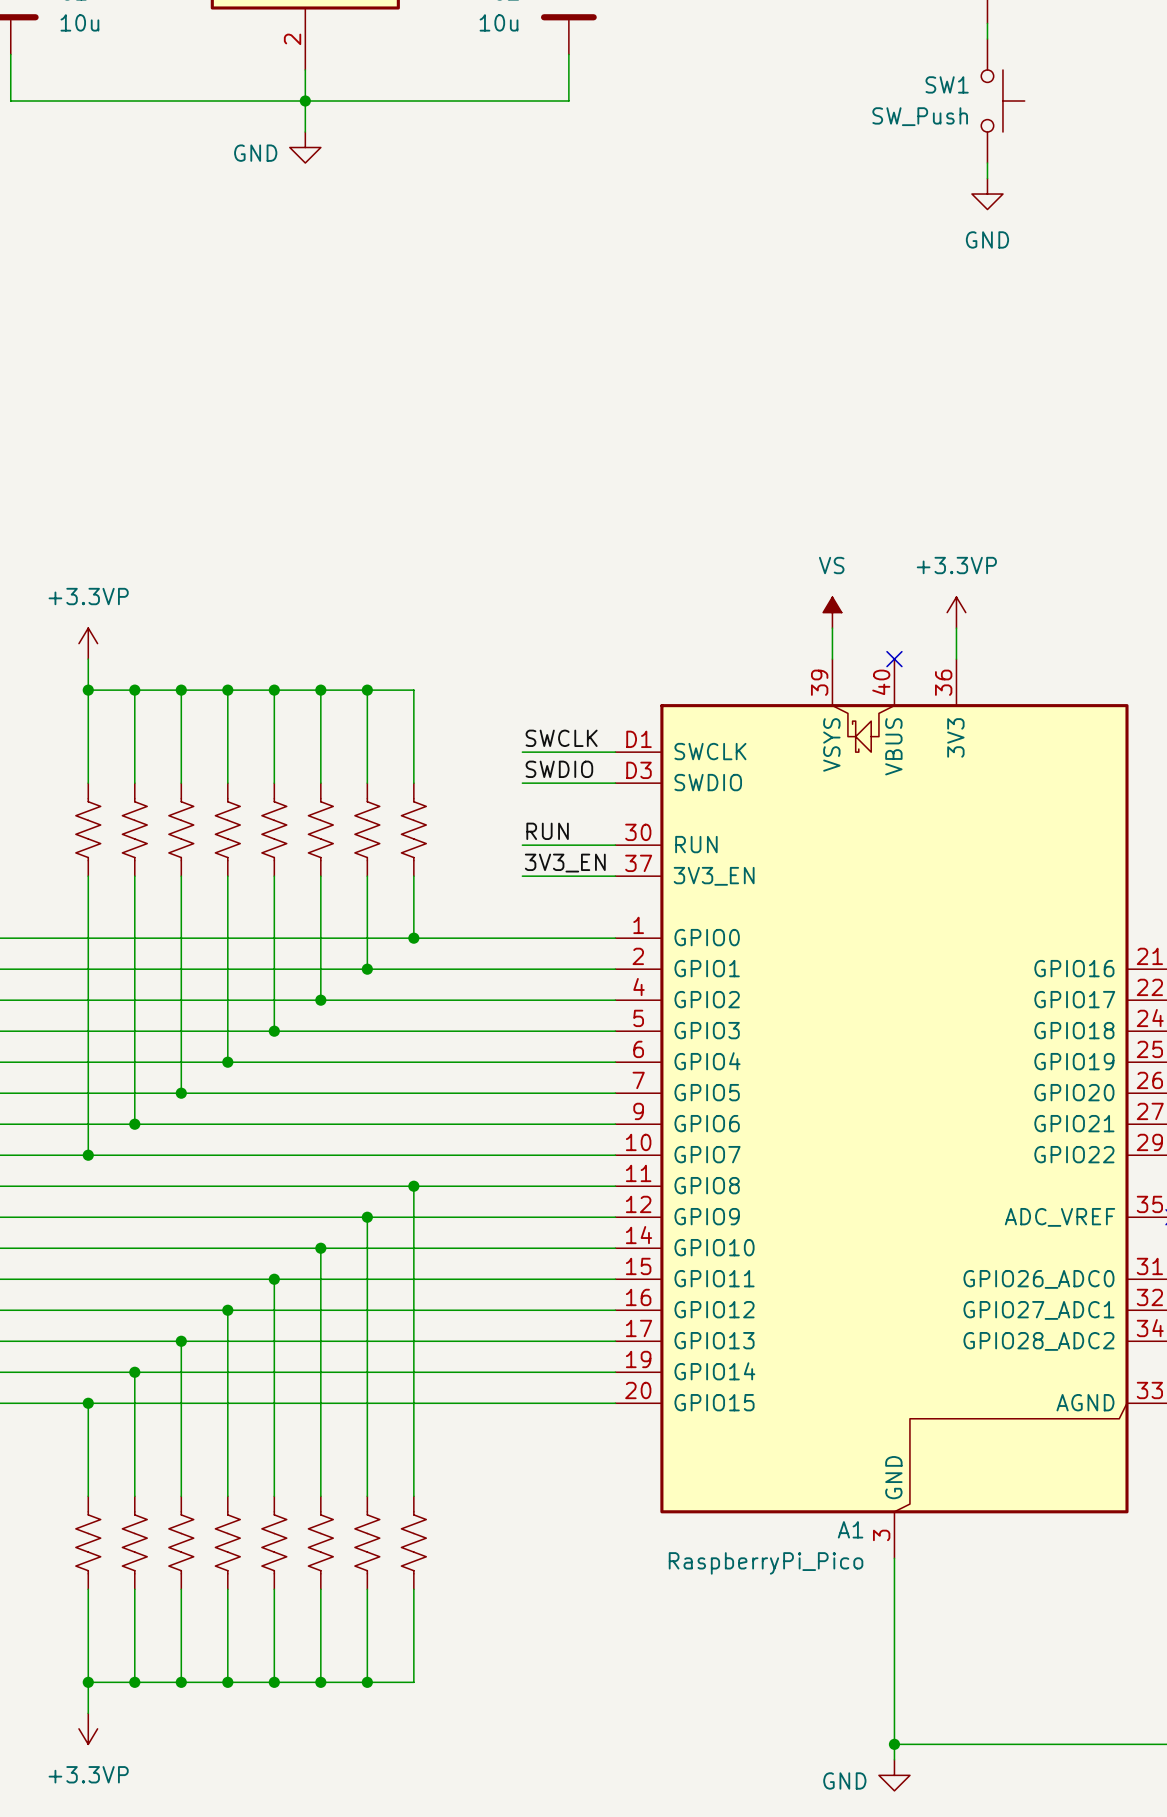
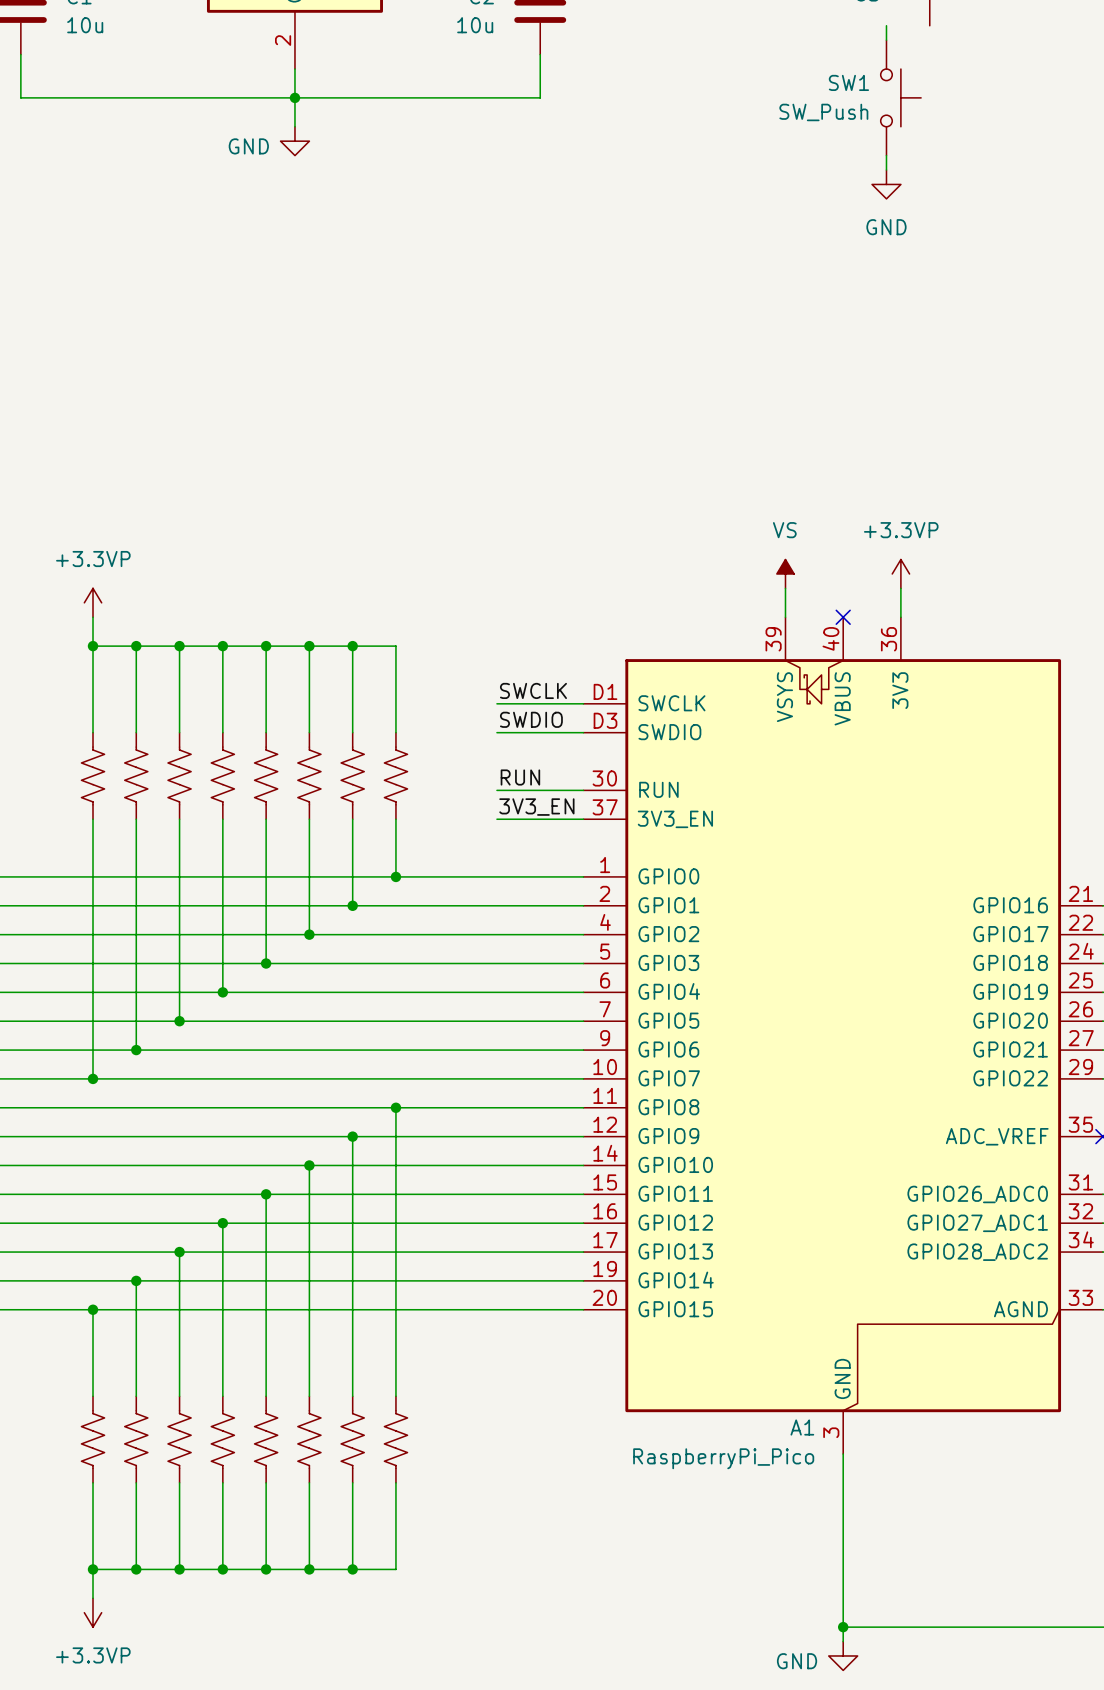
wire: (987, 23) (987, 38) -> (886, 25) (886, 40)
SW1 position: (1002, 101) -> (900, 97)
wire: (987, 163) (987, 178) -> (886, 155) (886, 170)
power symbol position: GND (987, 194) -> GND (886, 184)

